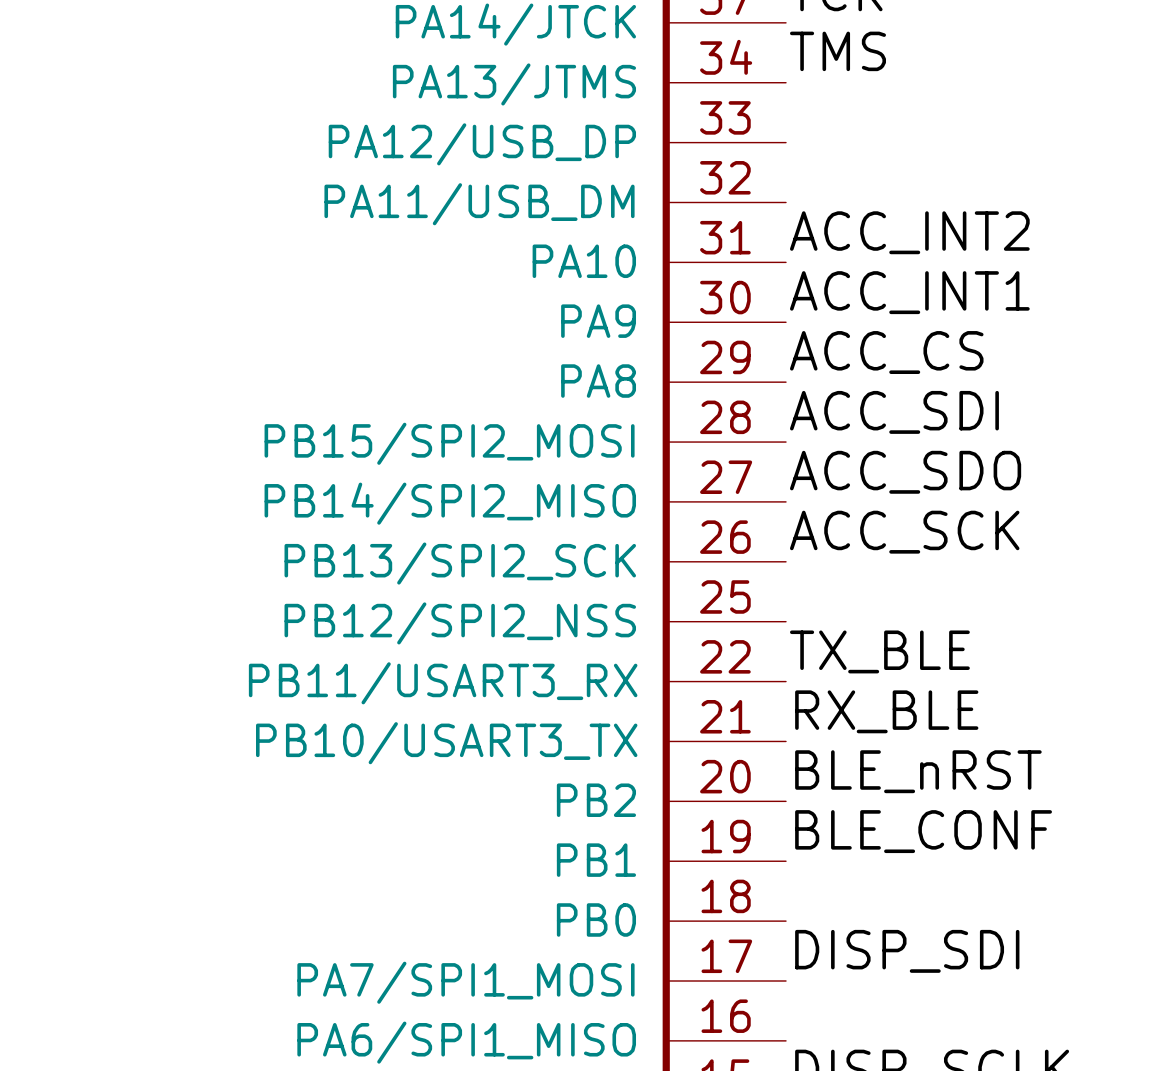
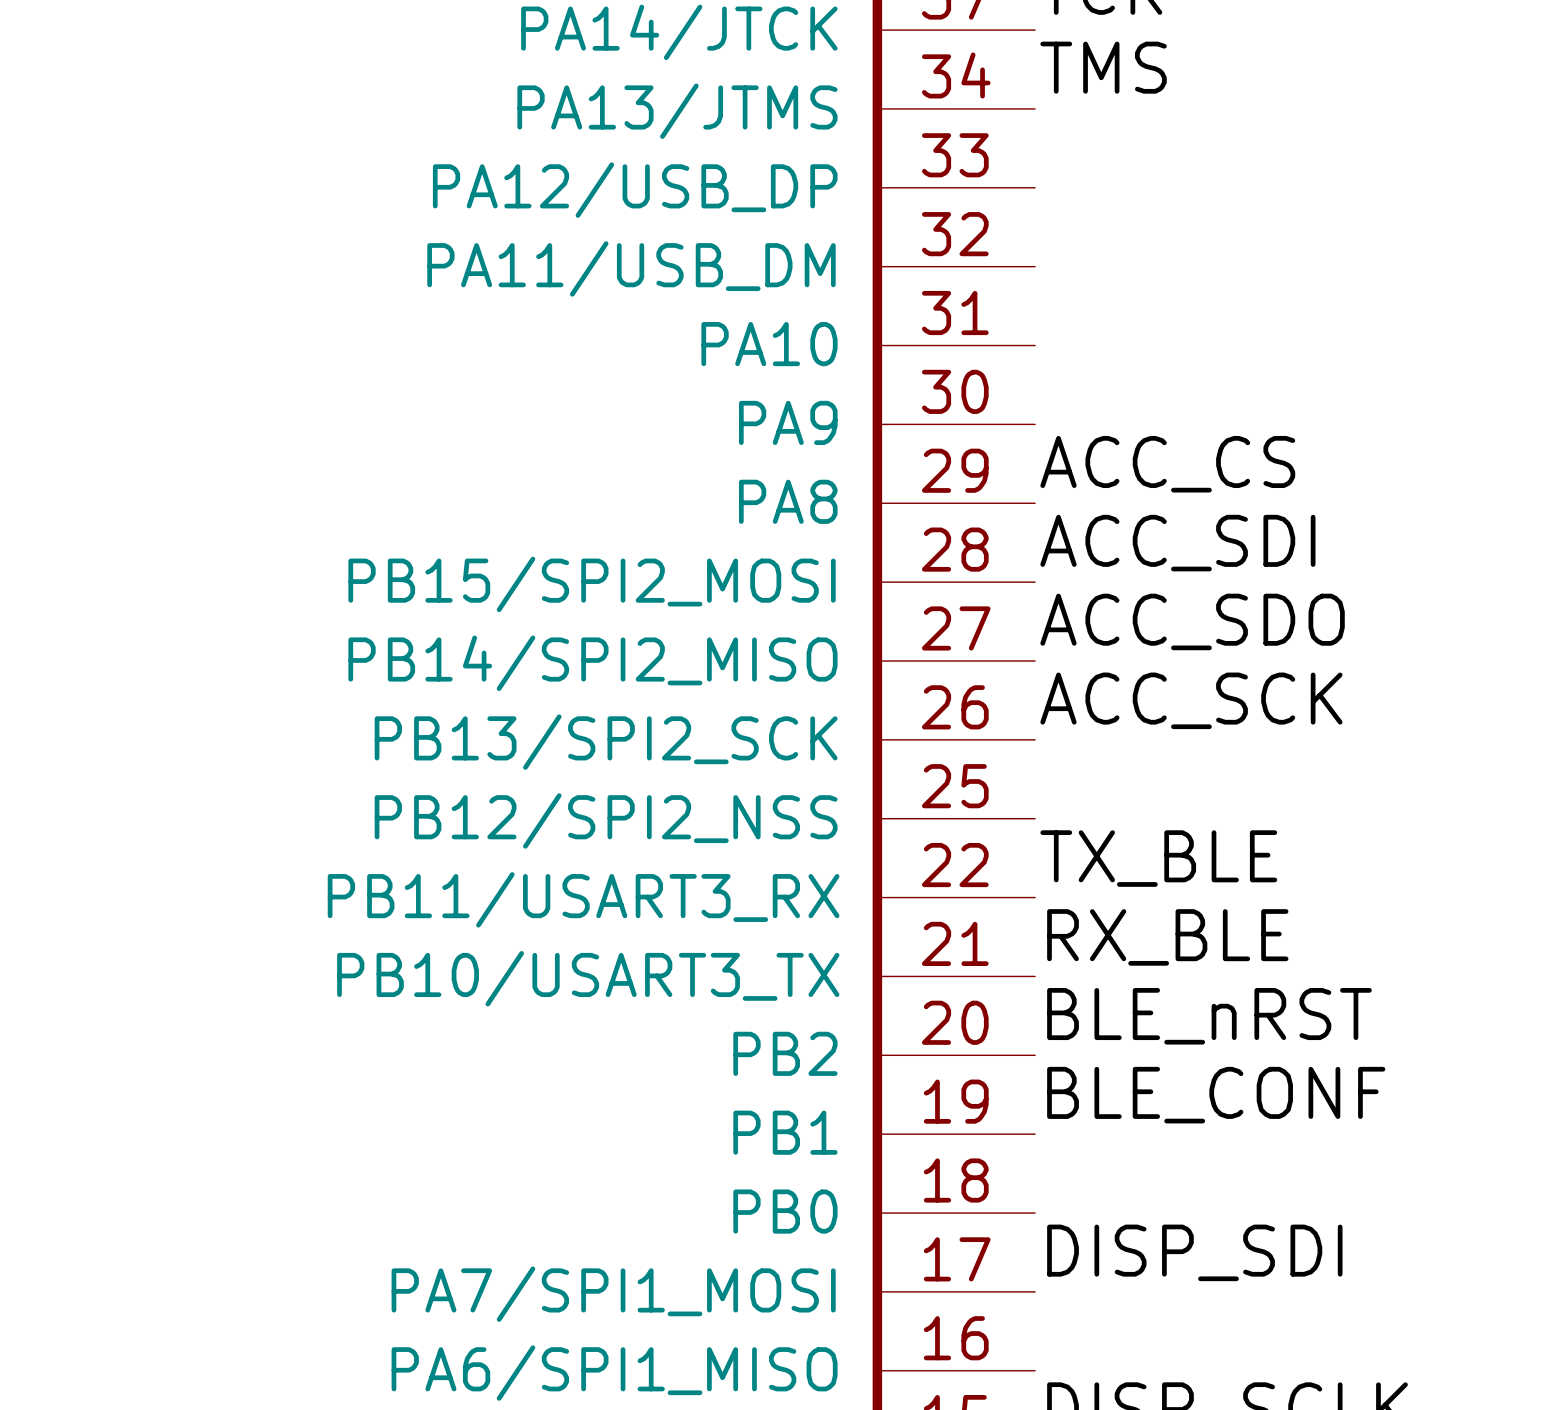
label: ACC_INT2 (909, 232) -> none
label: ACC_INT1 (909, 292) -> none

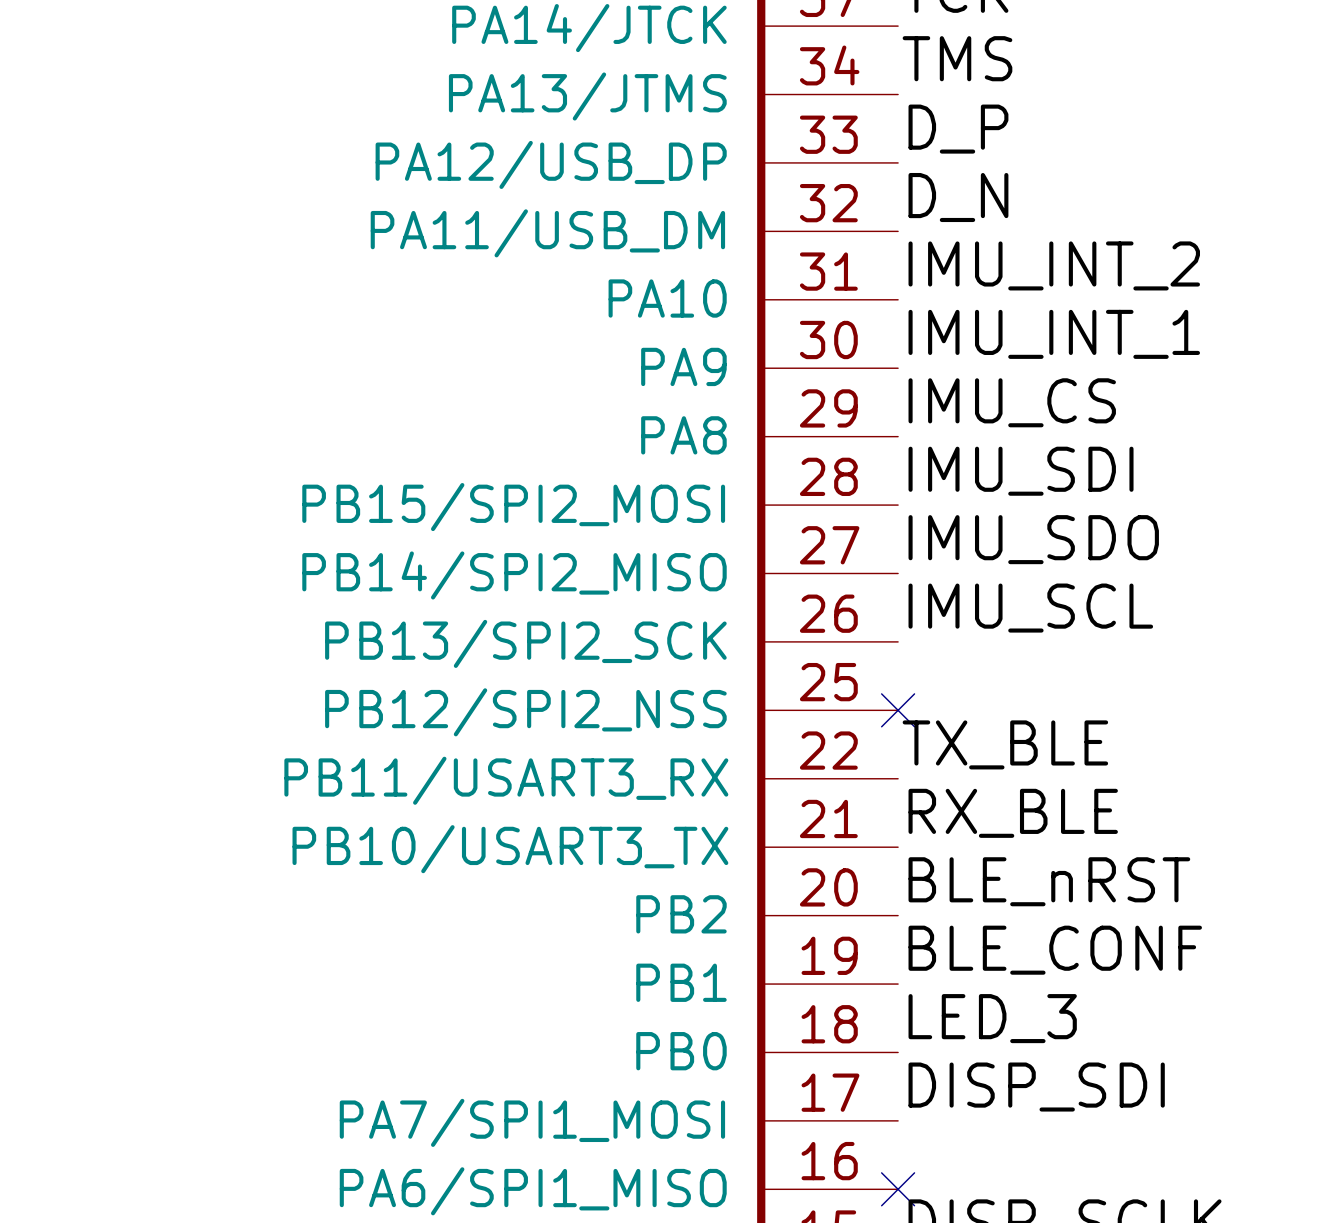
label: none -> D_P (958, 129)
label: none -> D_N (958, 197)
label: none -> IMU_INT_2 (1054, 265)
label: none -> IMU_INT_1 (1054, 334)
label: ACC_CS (1167, 464) -> IMU_CS (1012, 402)
label: ACC_SDI (1177, 543) -> IMU_SDI (1021, 471)
label: ACC_SDO (1192, 621) -> IMU_SDO (1033, 539)
label: ACC_SCK (1191, 700) -> IMU_SCL (1030, 608)
no-connect mark: none -> (898, 710)
label: none -> LED_3 (992, 1018)
no-connect mark: none -> (898, 1189)

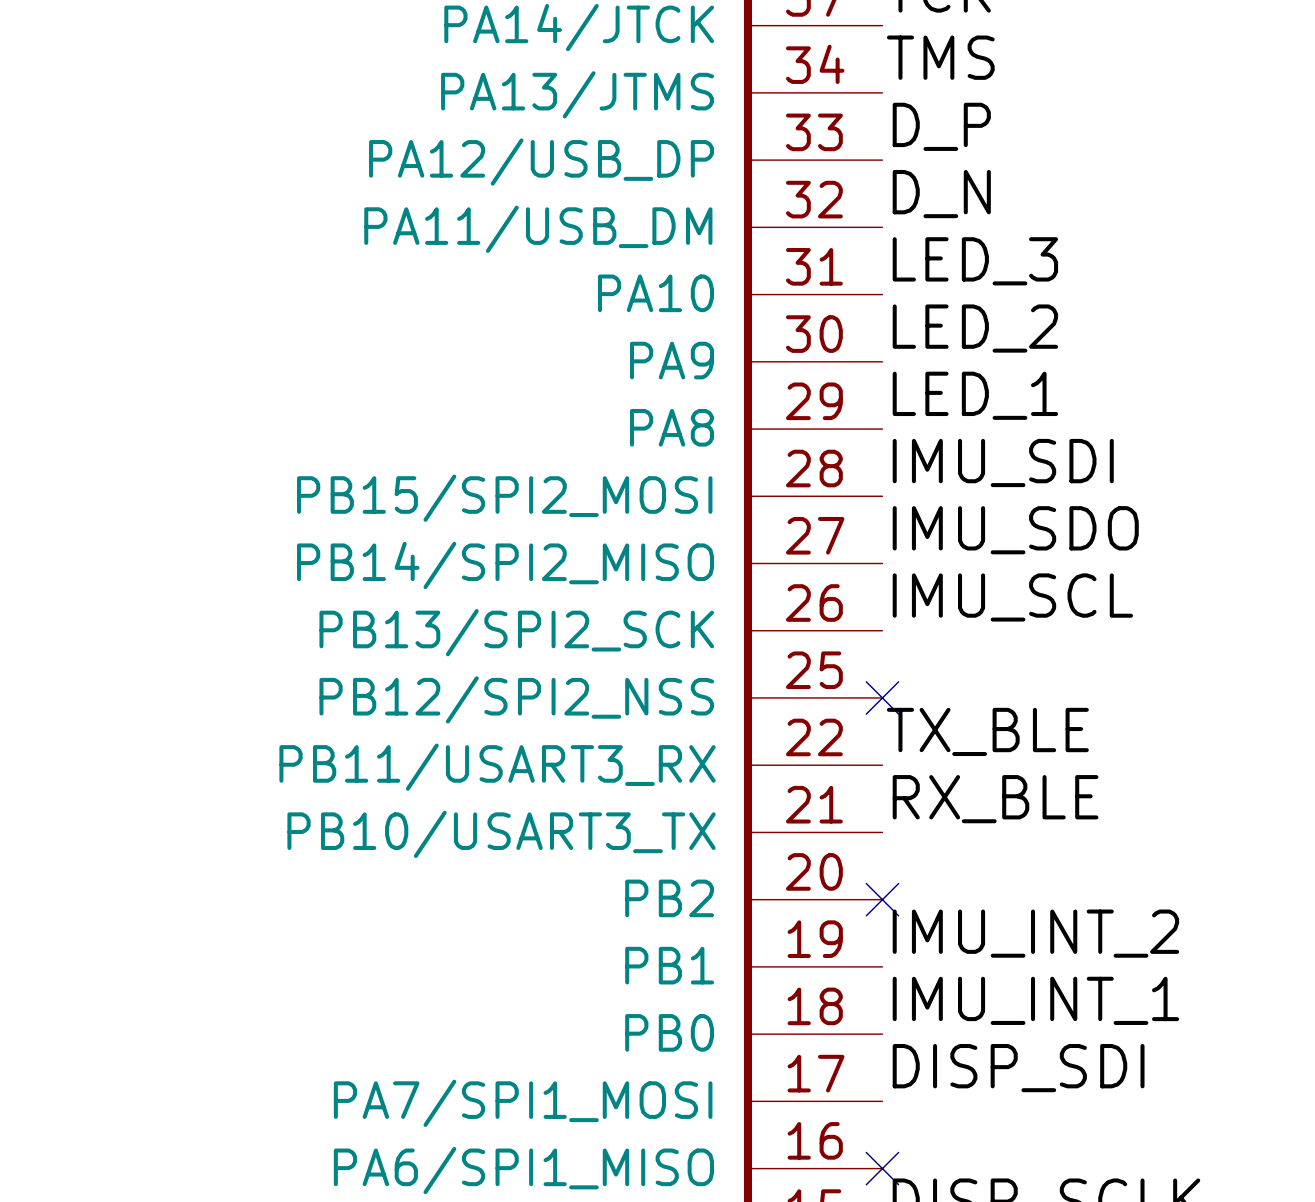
label: IMU_INT_2 (1054, 265) -> LED_3 (975, 261)
label: IMU_INT_1 (1054, 334) -> LED_2 (975, 328)
label: IMU_CS (1012, 402) -> LED_1 (975, 395)
label: BLE_nRST (1049, 881) -> none
no-connect mark: none -> (882, 899)
label: BLE_CONF (1055, 950) -> IMU_INT_2 (1035, 933)
label: LED_3 (992, 1018) -> IMU_INT_1 (1035, 1000)

